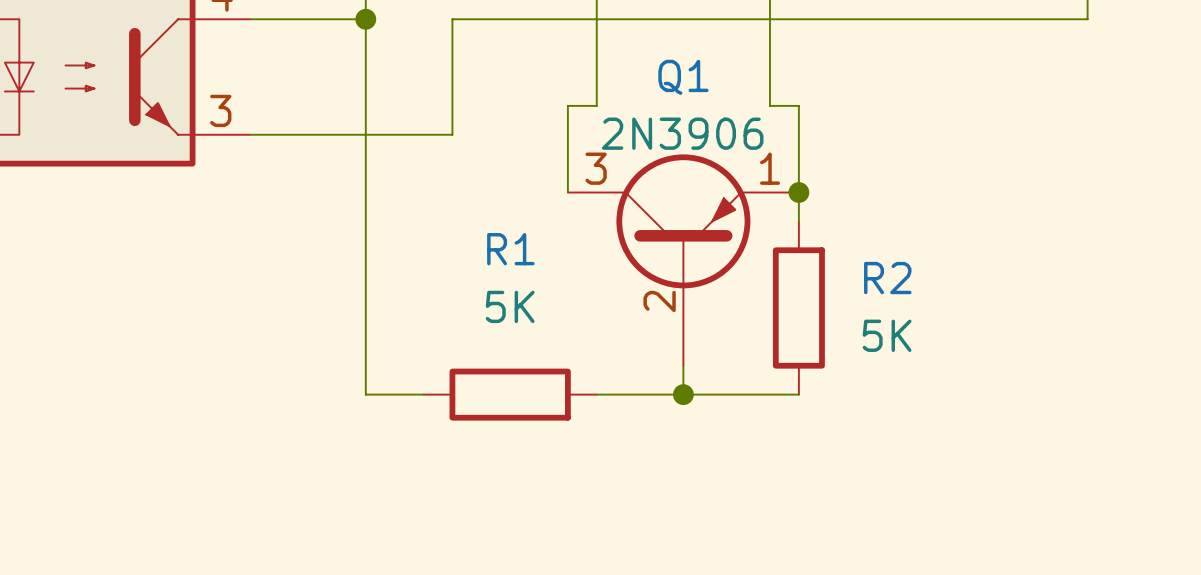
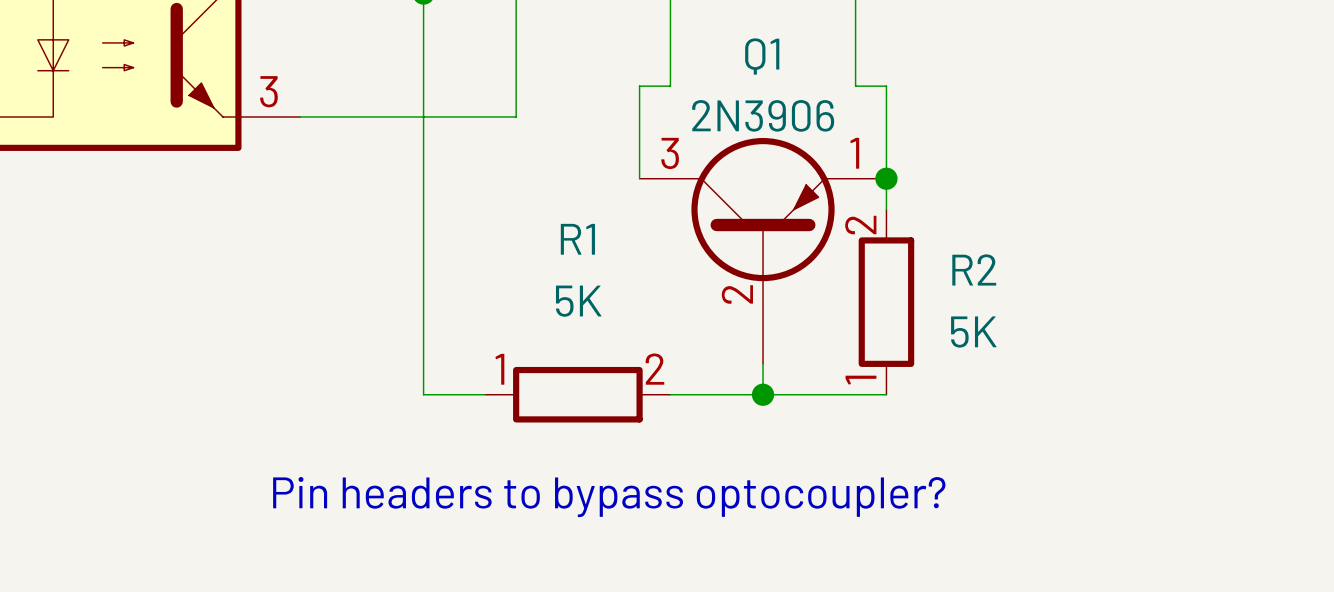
R2 pin number: none -> 2 (860, 225)
R1 pin number: none -> 1 (499, 369)
R1 pin number: none -> 2 (654, 369)
R2 pin number: none -> 1 (860, 380)
text: none -> Pin headers to bypass optocoupler? (609, 497)

